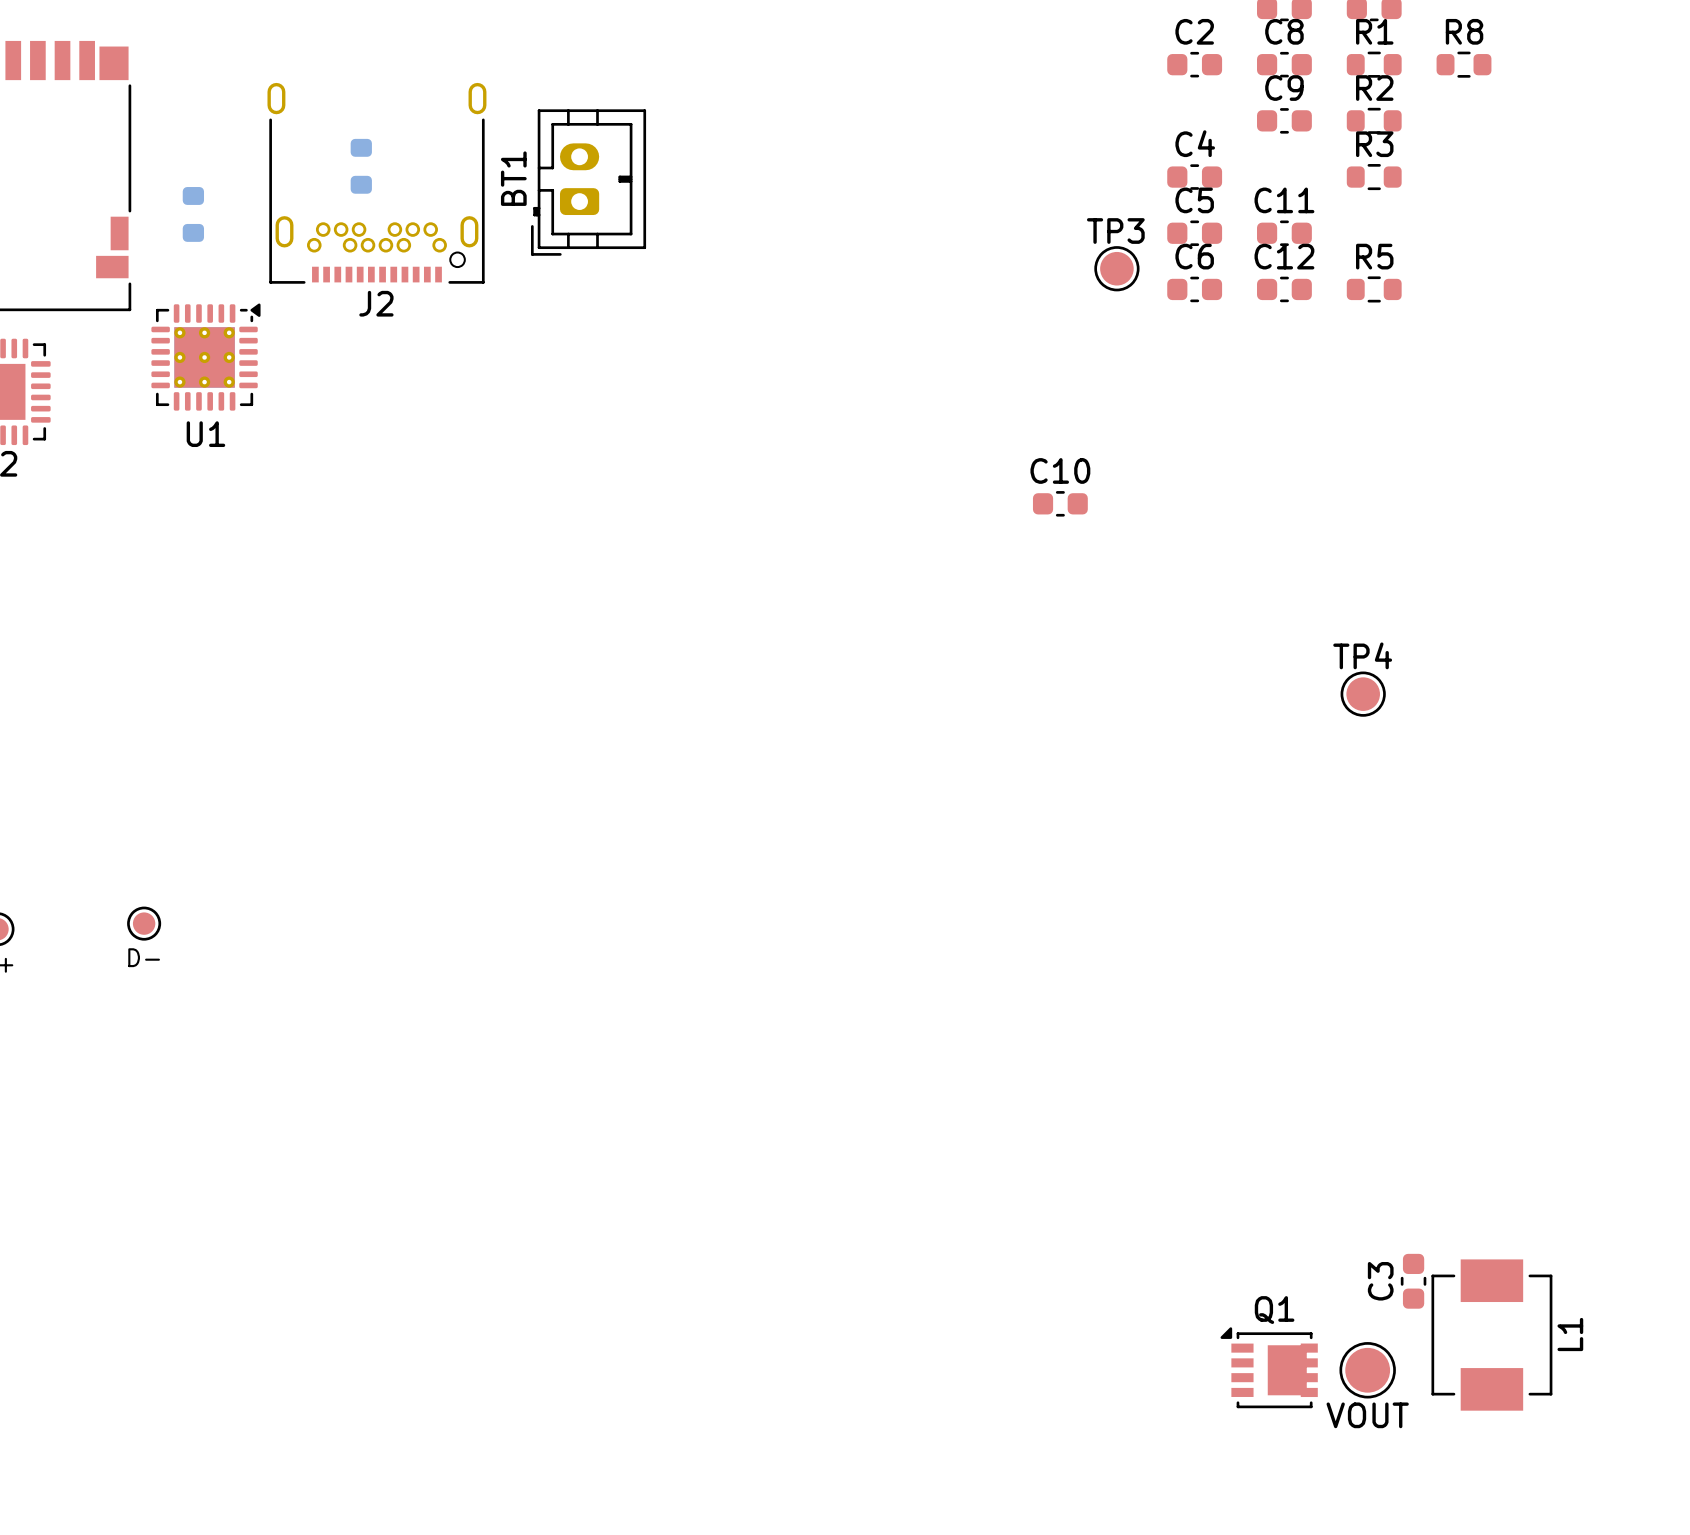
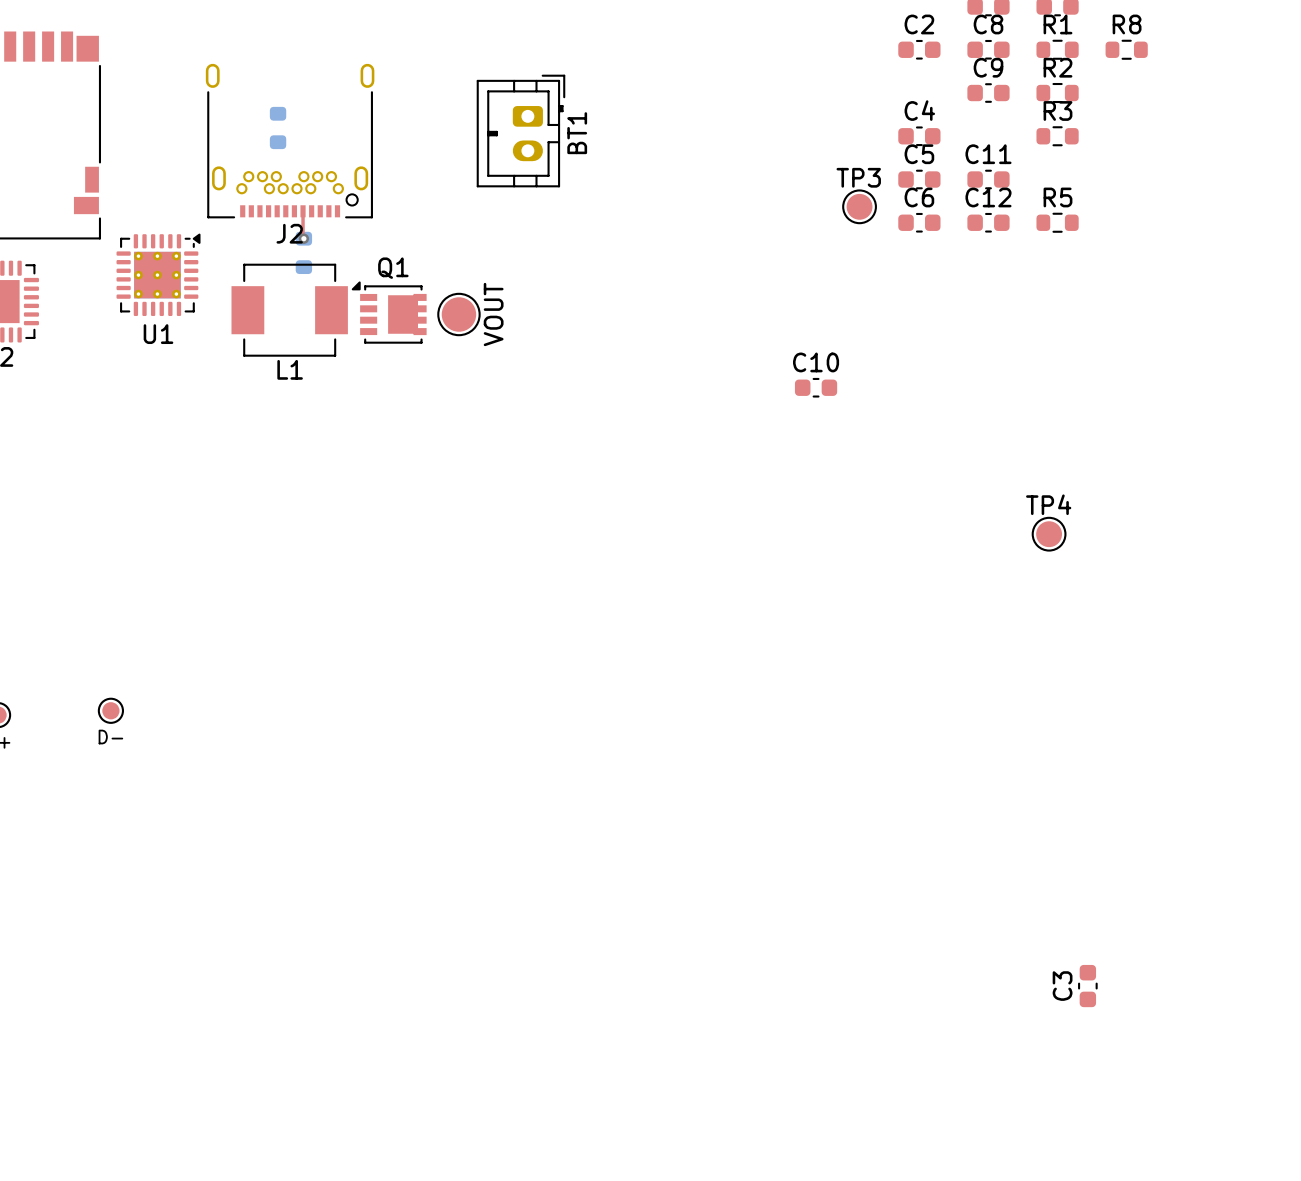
BT1 rotation: 0° (588, 182) -> 180° (520, 131)
BT1 position: (588, 182) -> (520, 131)
part position: (193, 214) -> (303, 252)
top track: none -> (303, 211) (303, 238)
via: none -> (303, 238)
part: none -> VOUT (458, 314)
L1 rotation: 0° (1491, 1335) -> 90° clockwise (289, 310)
L1 position: (1491, 1335) -> (289, 310)
Q1 position: (1269, 1367) -> (389, 312)
part: VOUT (1367, 1370) -> none

